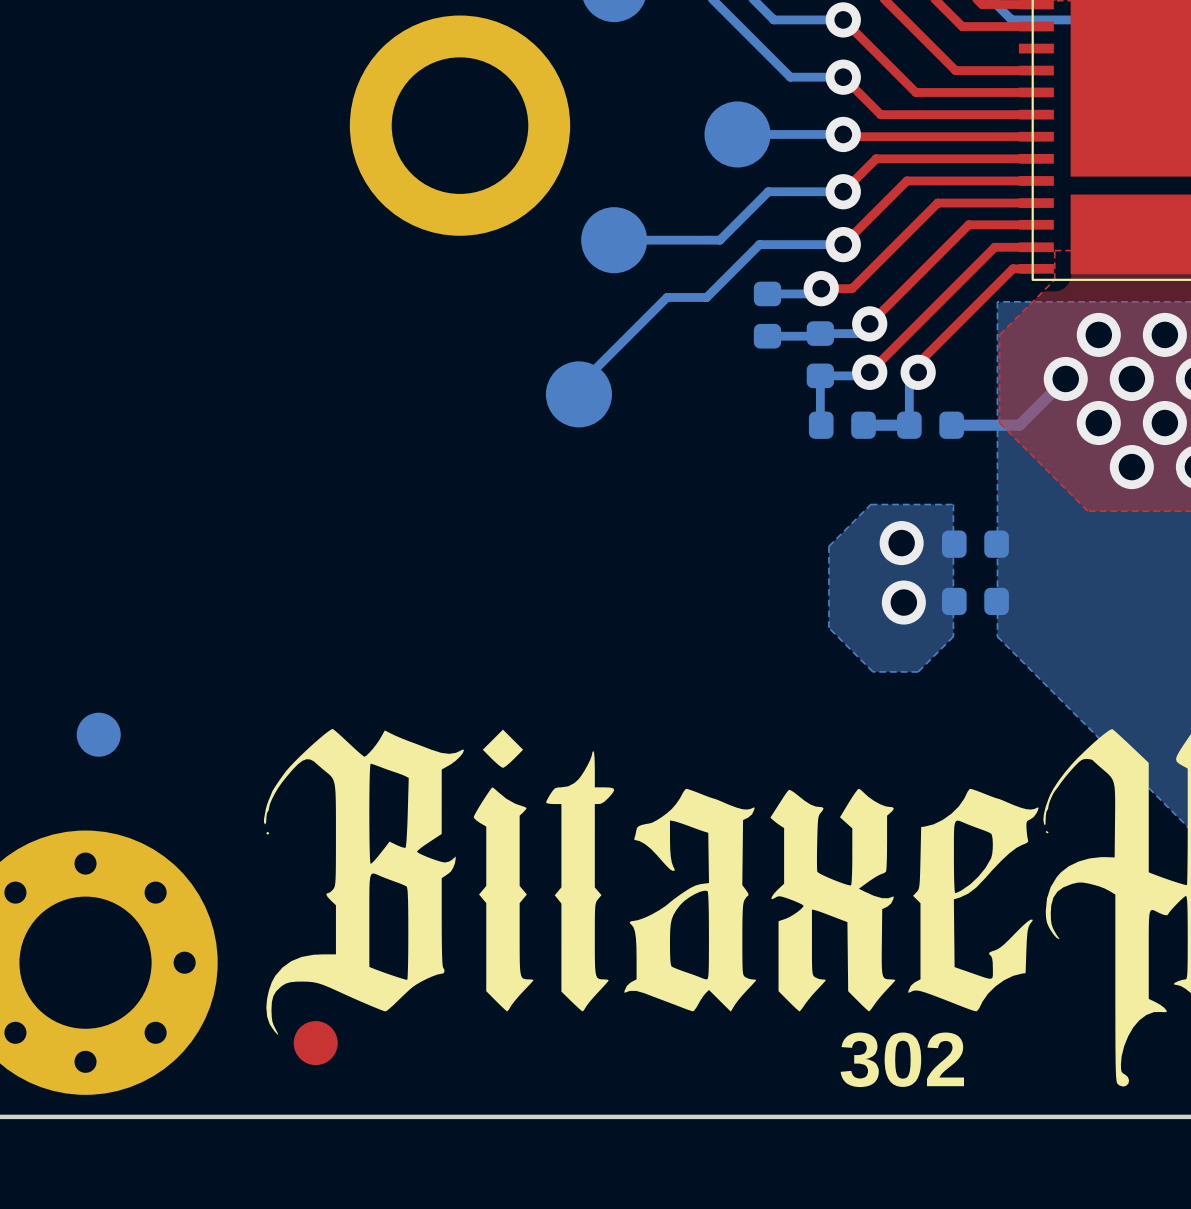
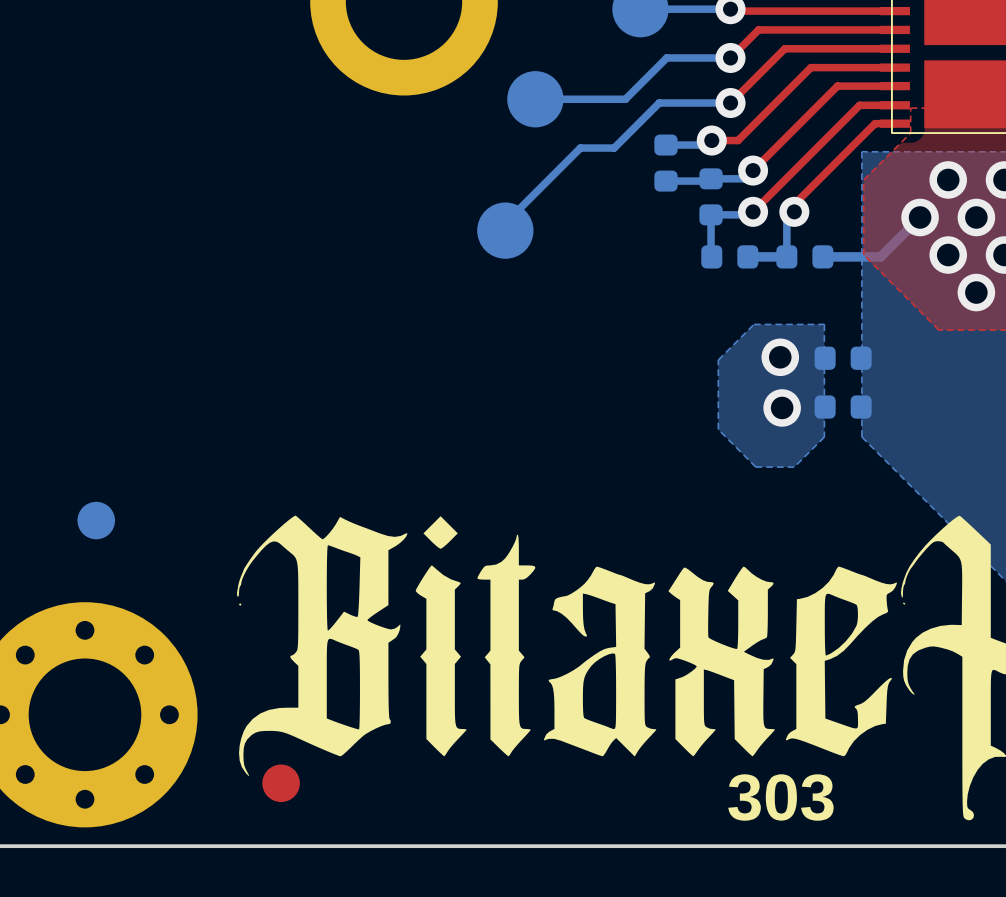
text: 302 (902, 1059) -> 303 (780, 797)

